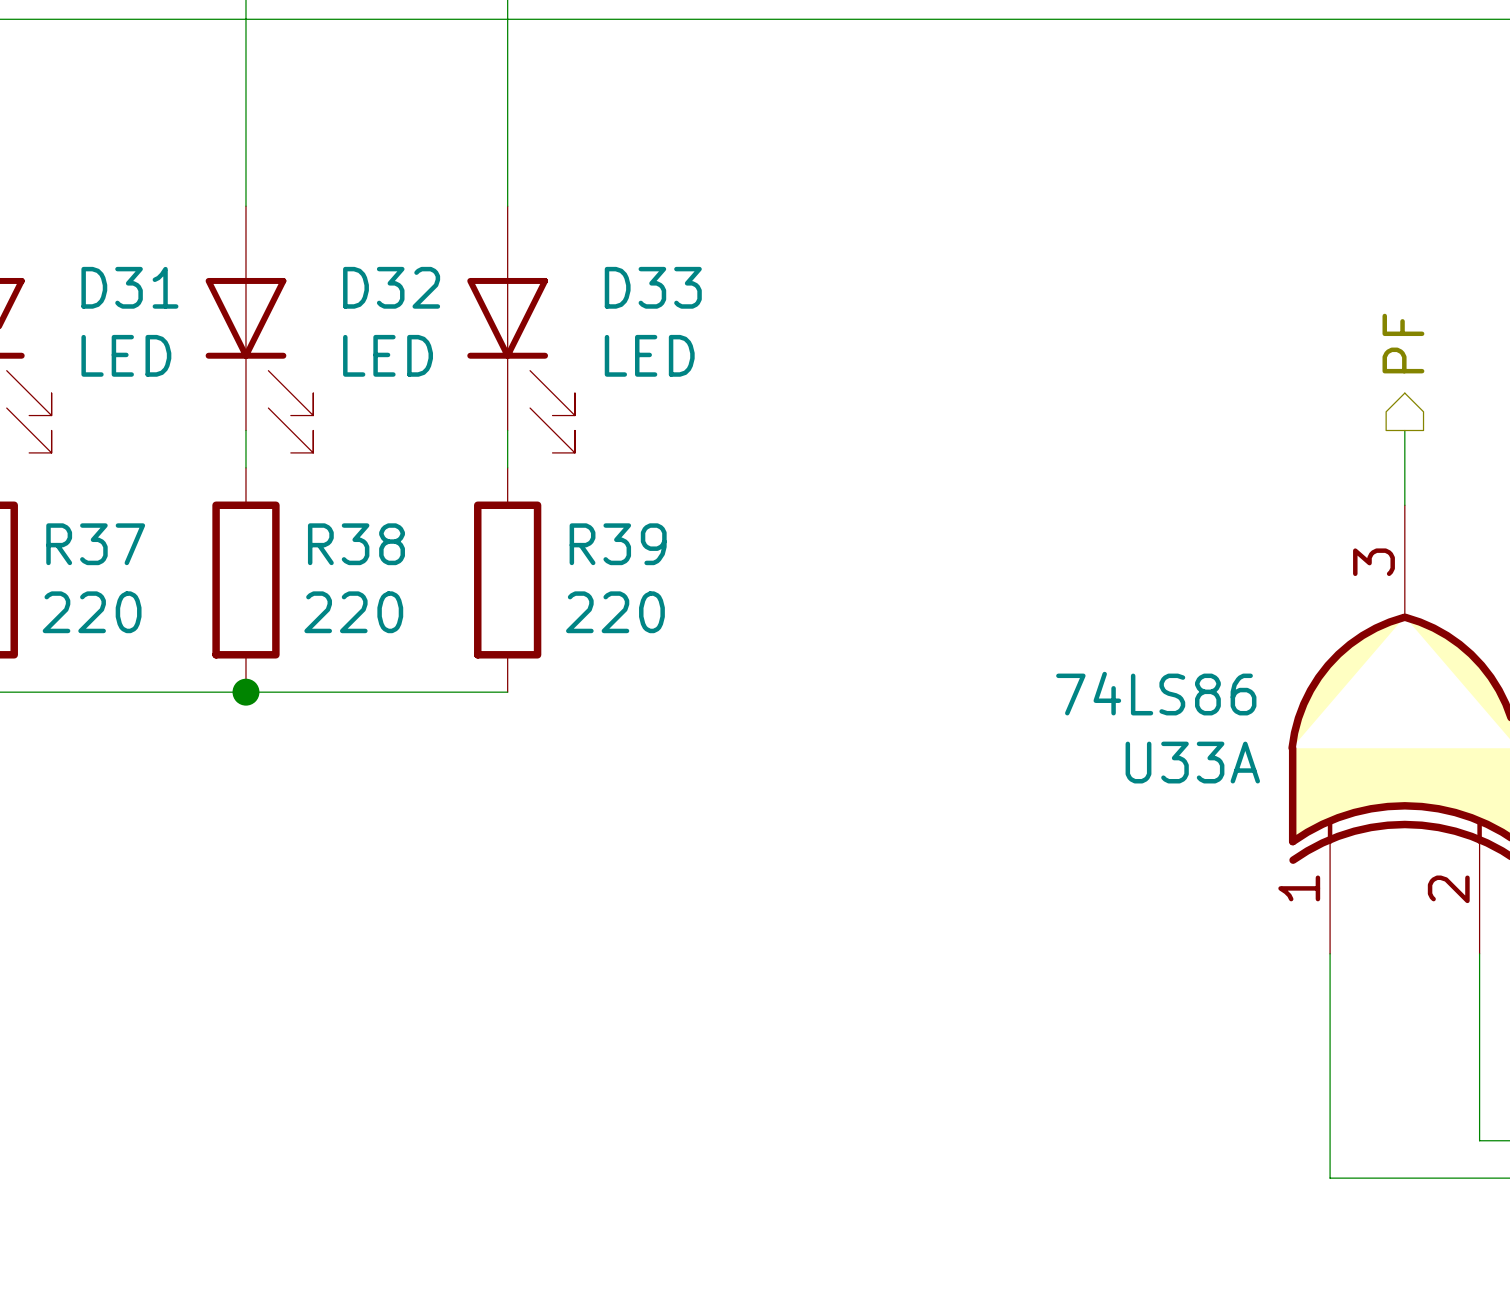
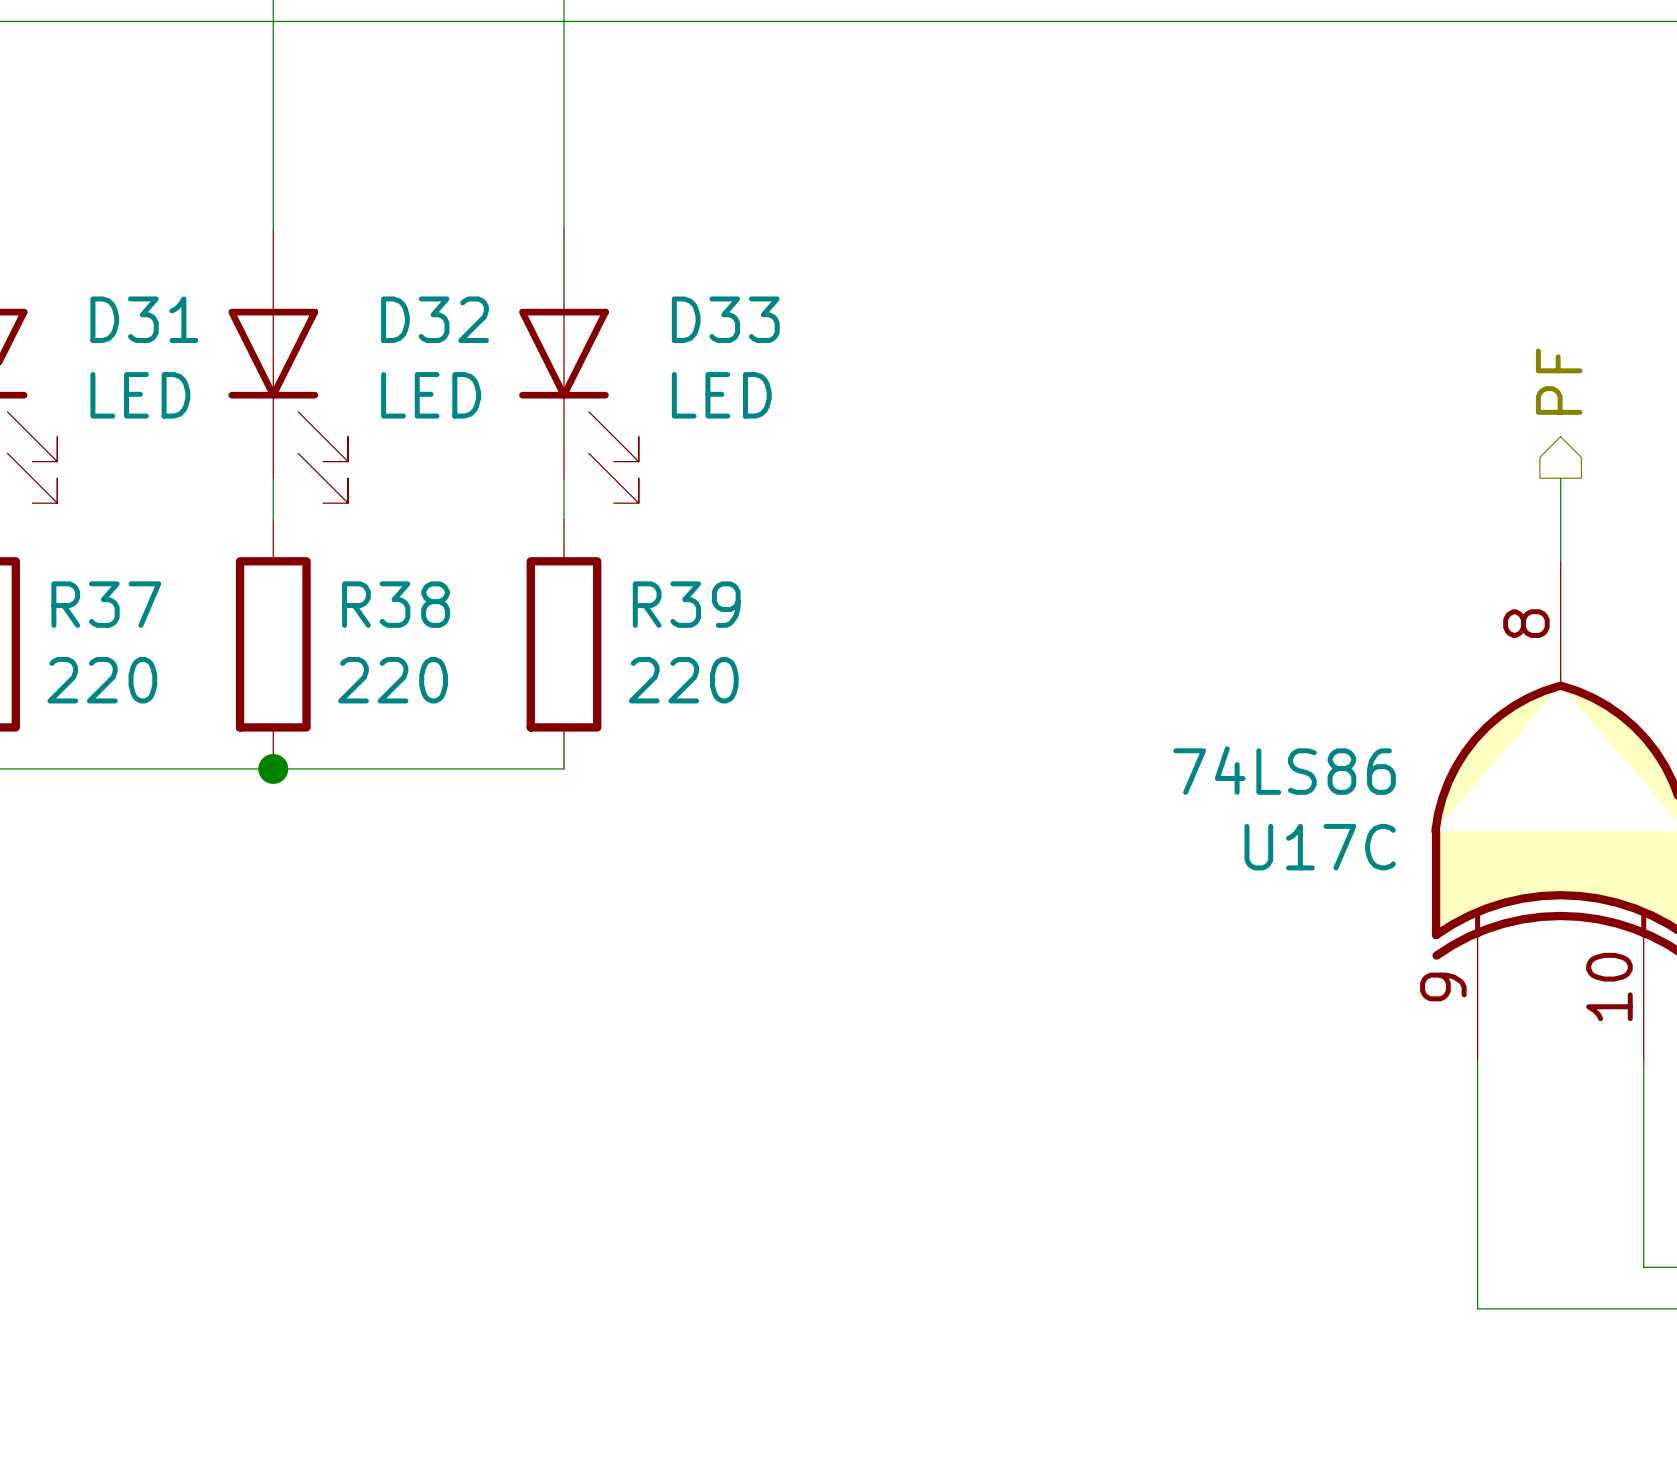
U33A pin number: 3 (1373, 562) -> 8 (1526, 623)
U33A name: U33A (1192, 762) -> U17C (1320, 847)
U33A pin number: 1 (1299, 888) -> 9 (1443, 986)
U33A pin number: 2 (1448, 889) -> 10 (1609, 986)

